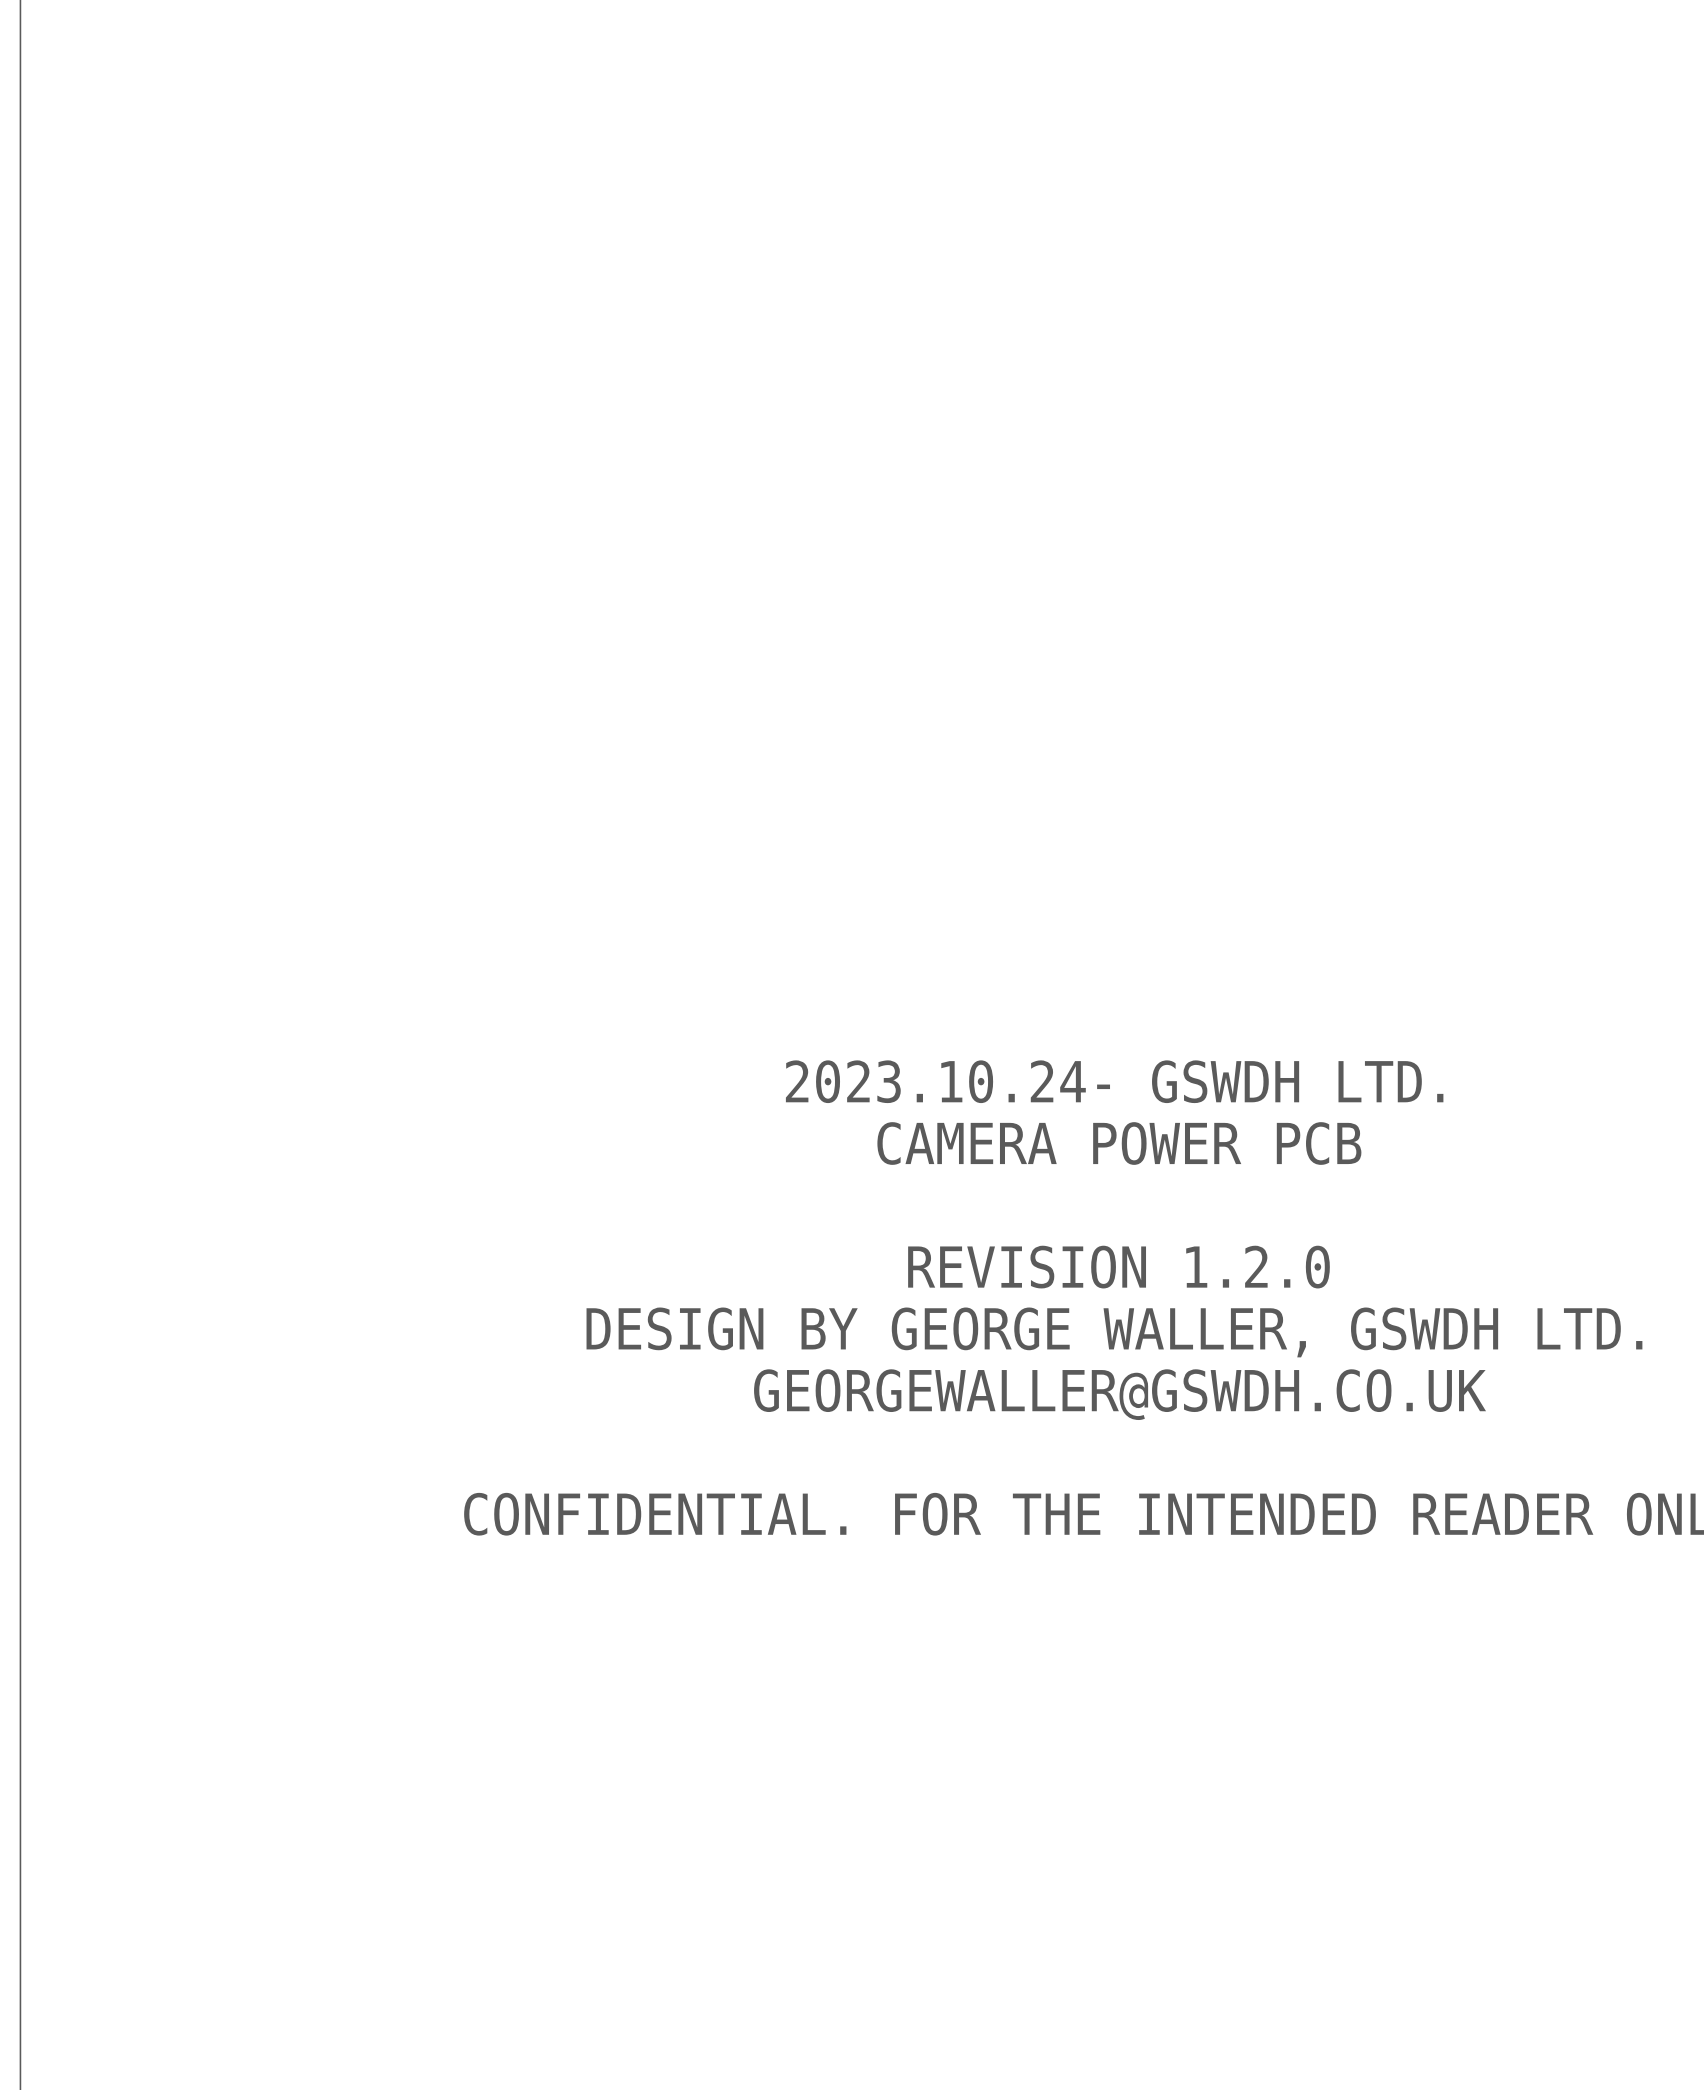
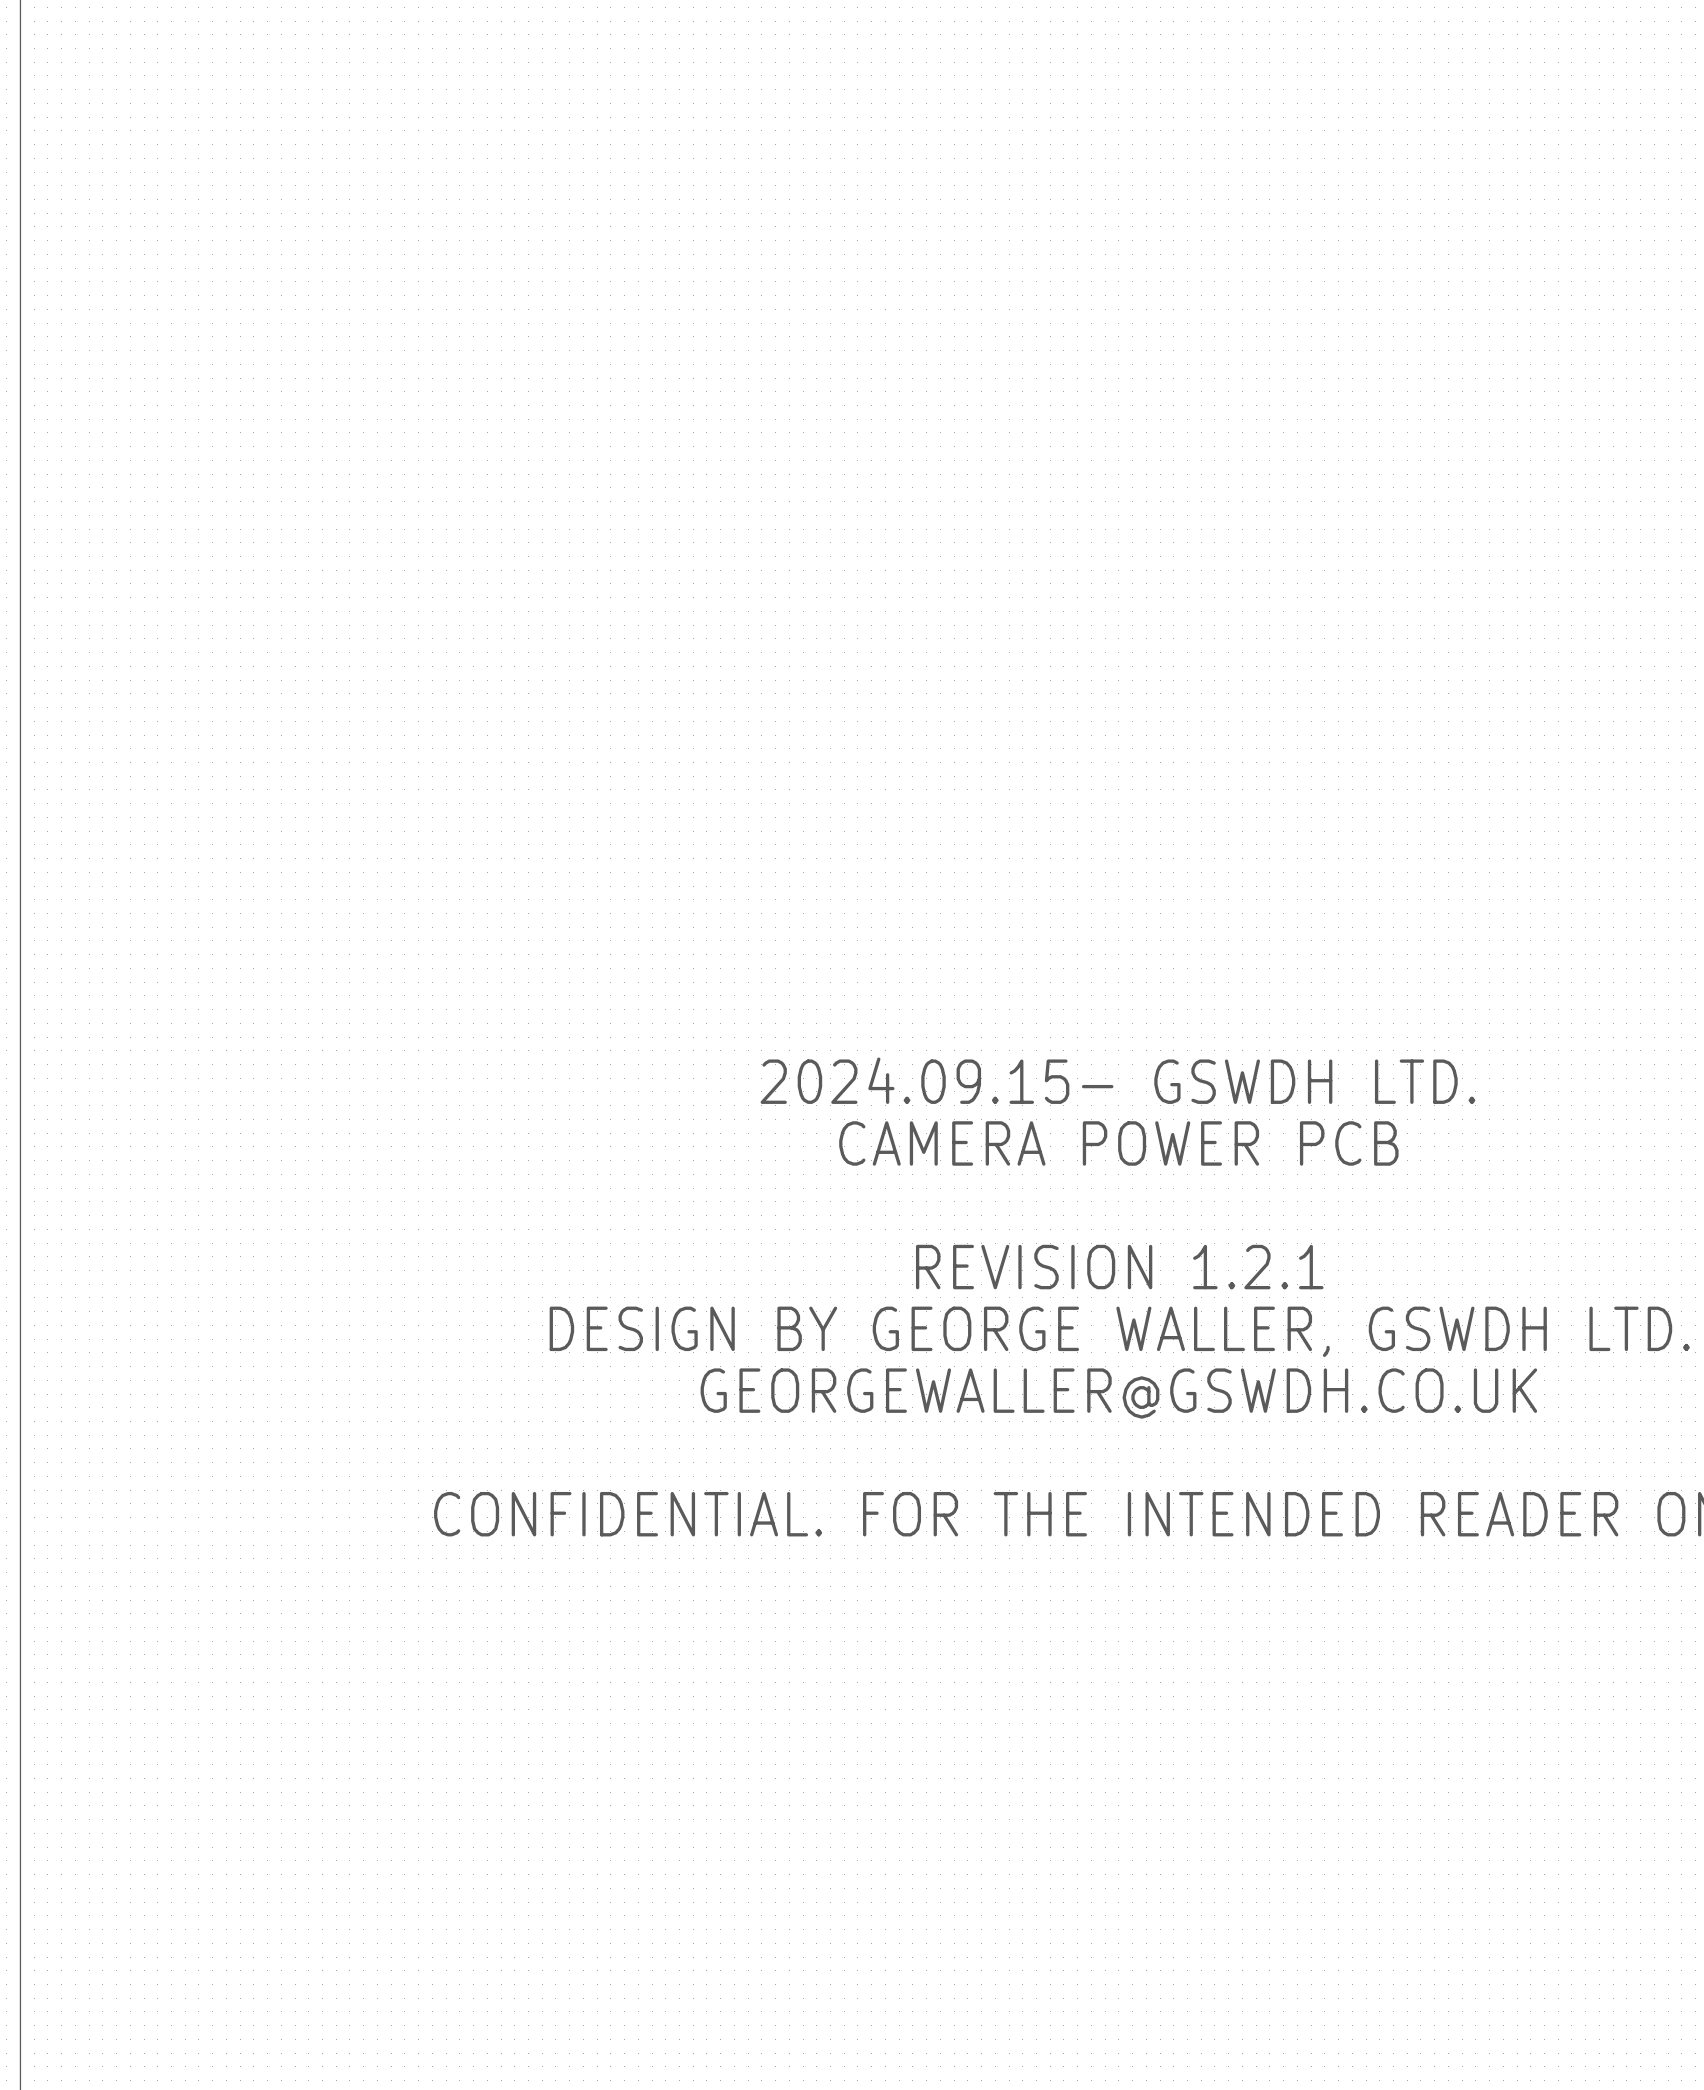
text: 2023.10.24- GSWDH LTD. (1114, 1081) -> 2024.09.15- GSWDH LTD. (1117, 1080)
text: REVISION 1.2.0 (1118, 1267) -> REVISION 1.2.1 (1119, 1267)

